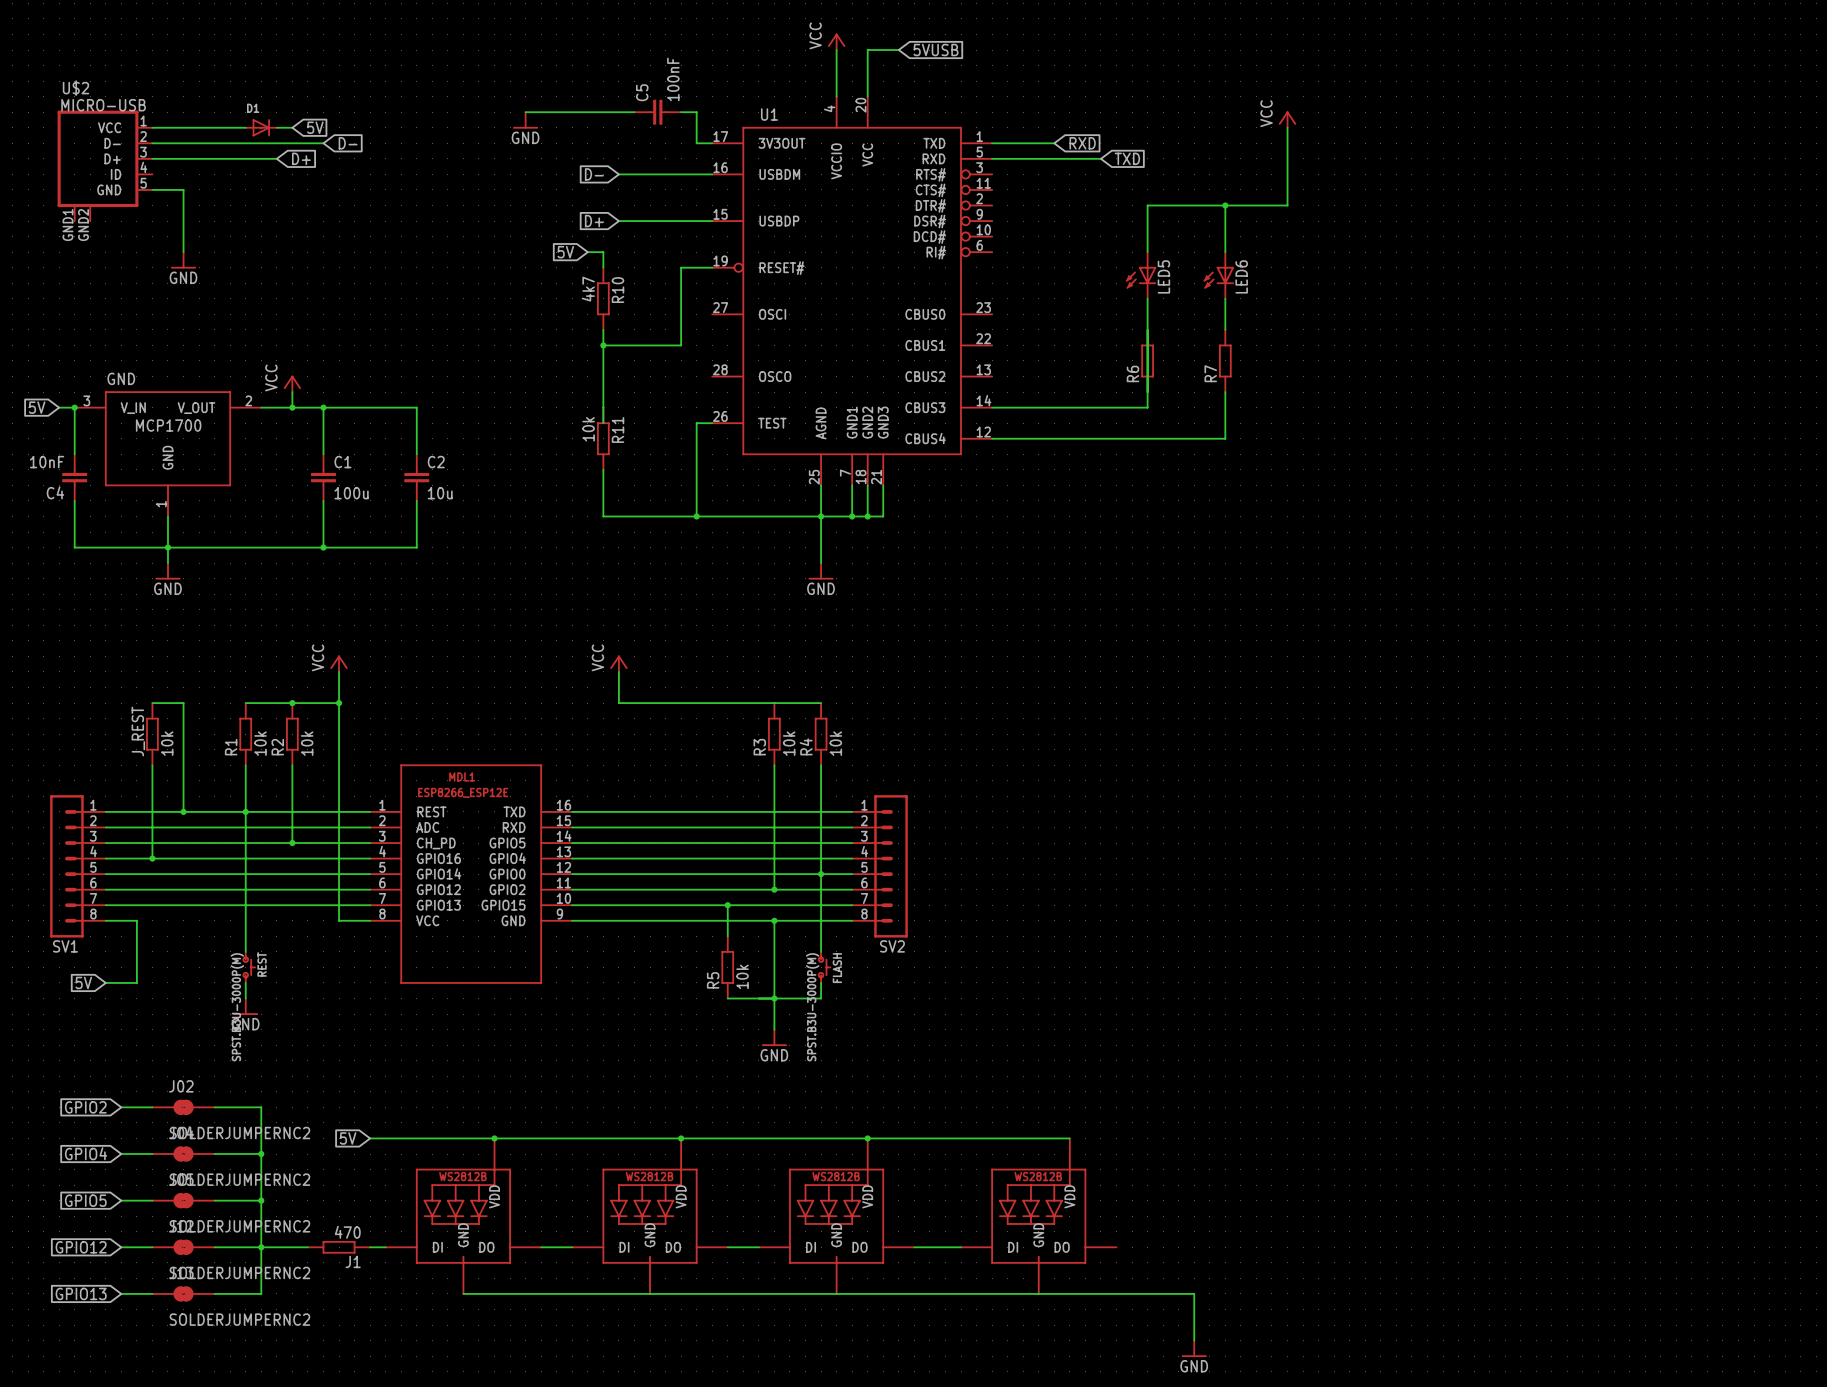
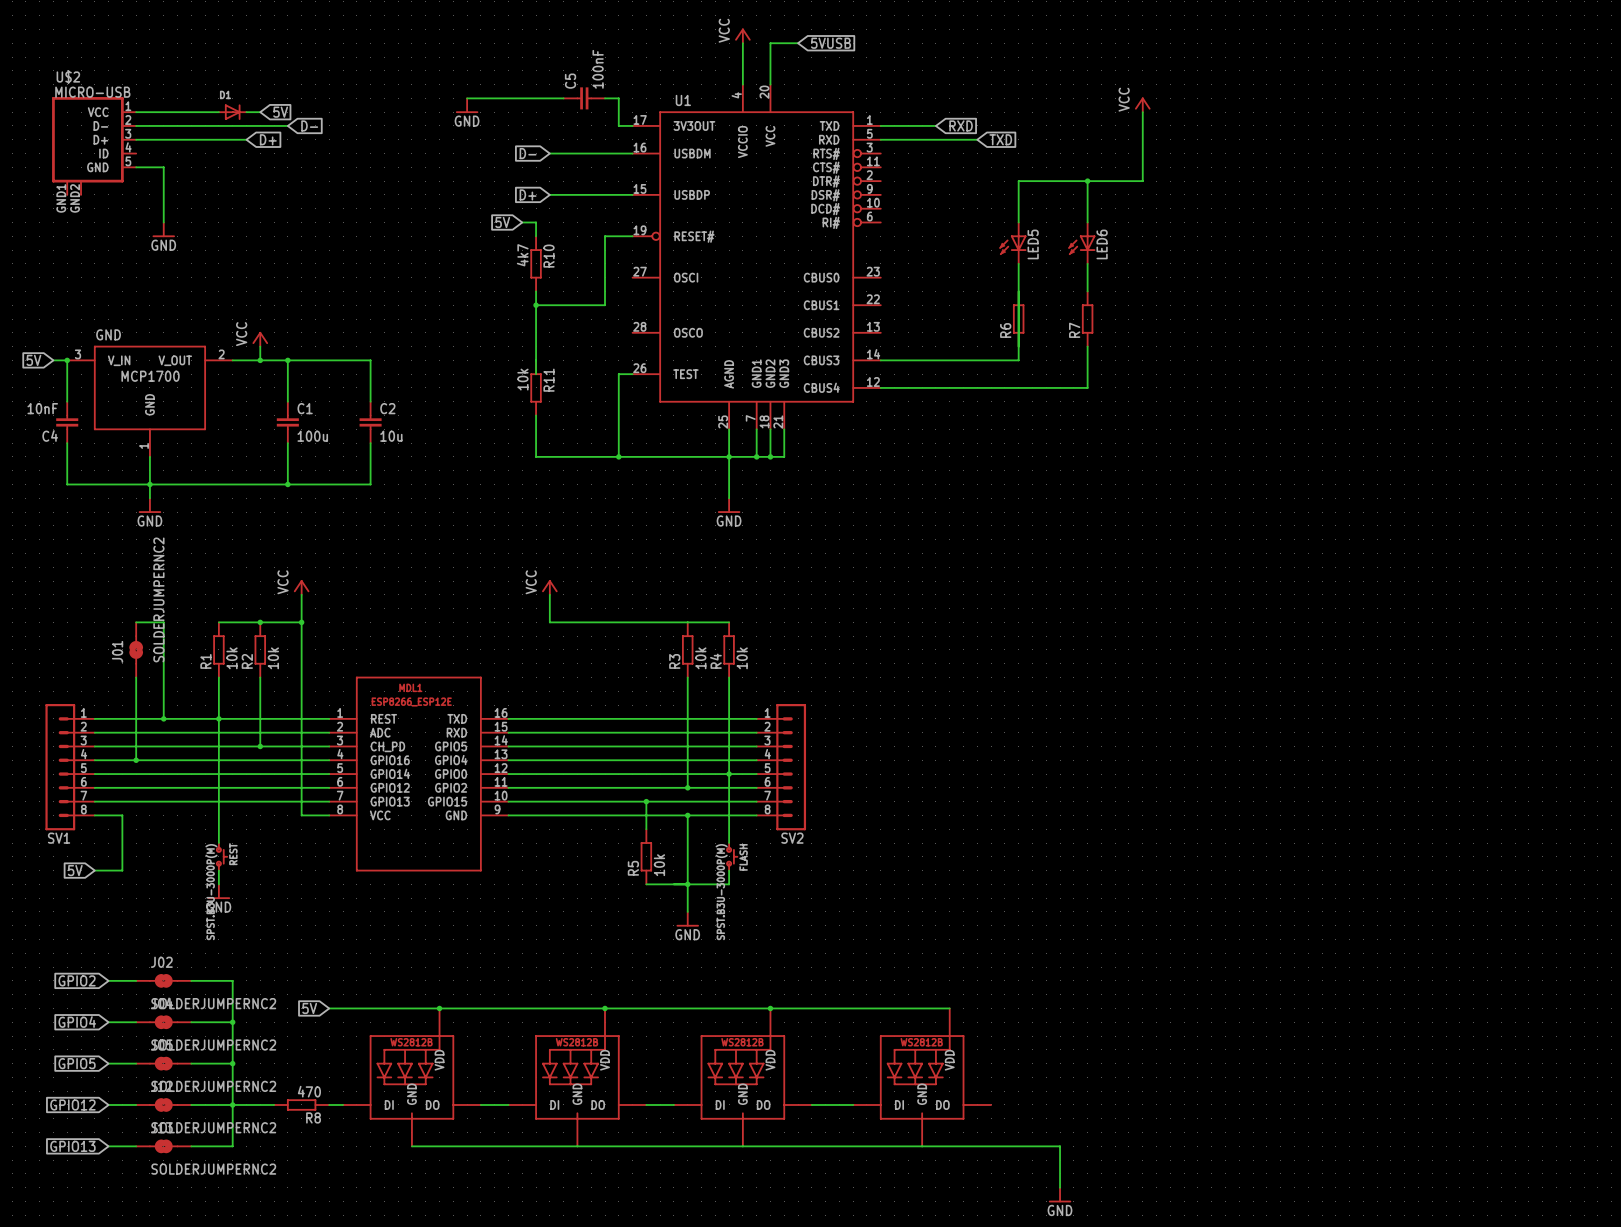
J_REST: 10k (152, 734) -> none
J01: none -> SOLDERJUMPERNC2 (136, 649)
J1 name: J1 (353, 1261) -> R8 (313, 1117)

